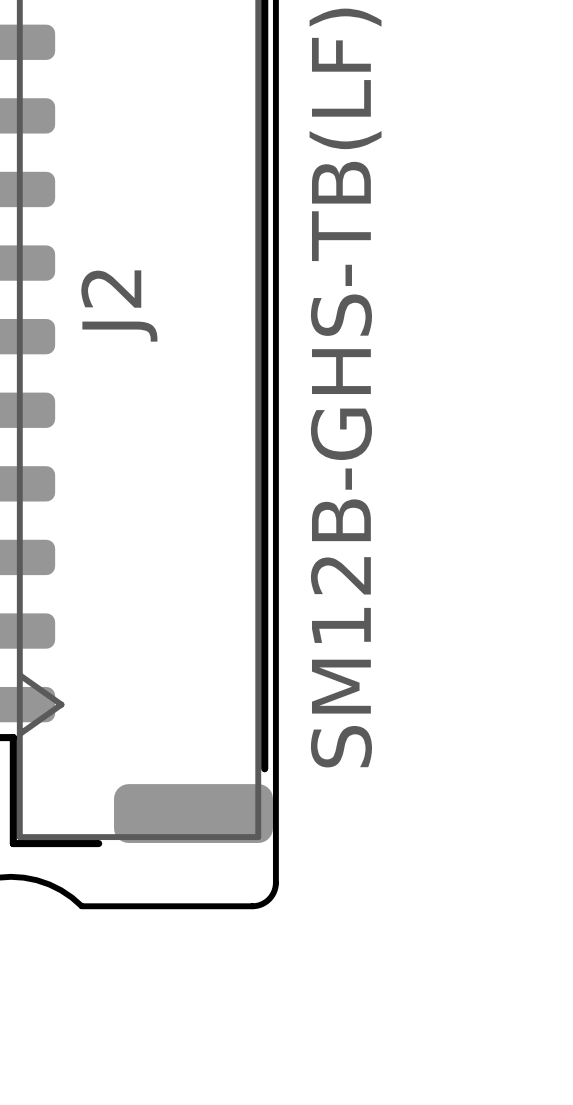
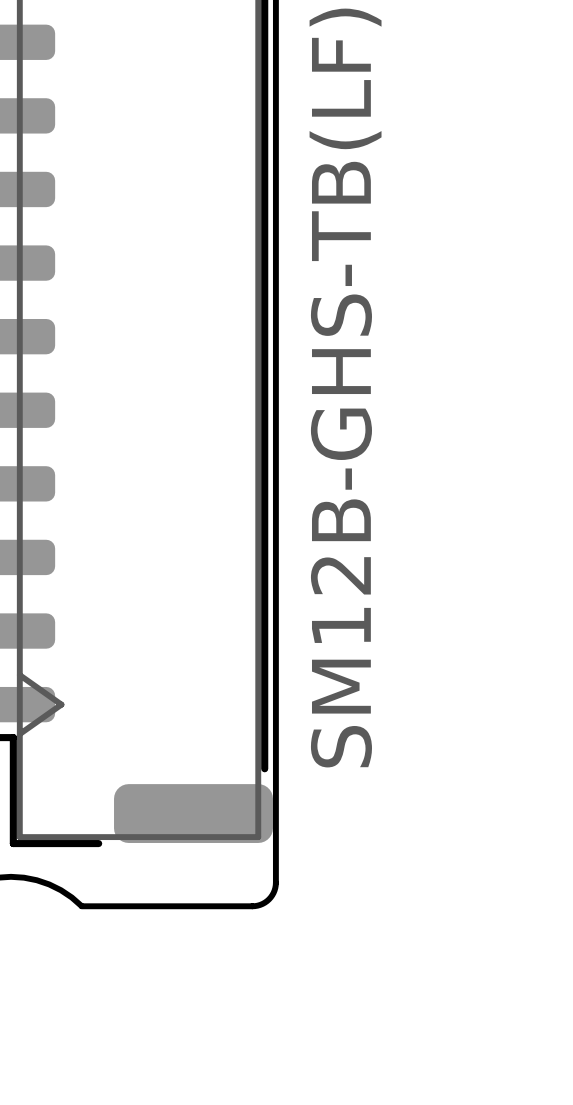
J2 name: J2 (119, 305) -> none

